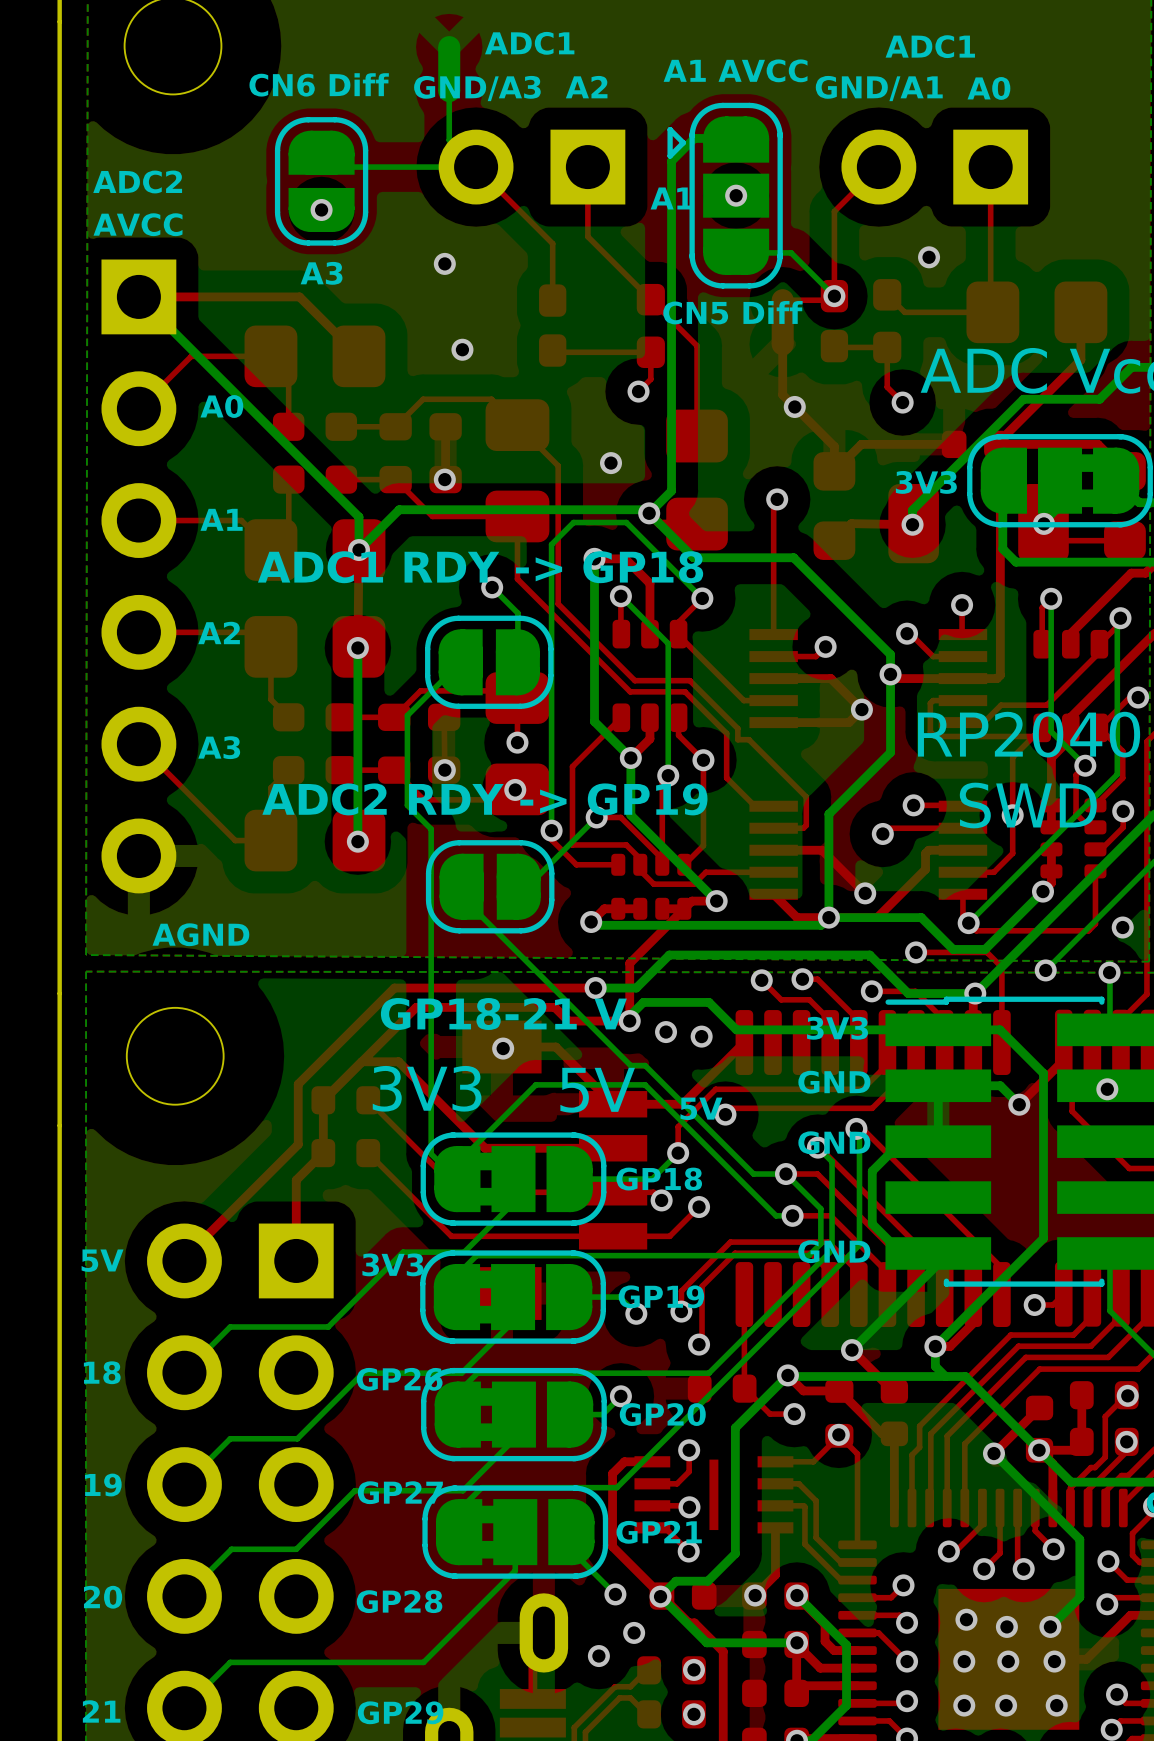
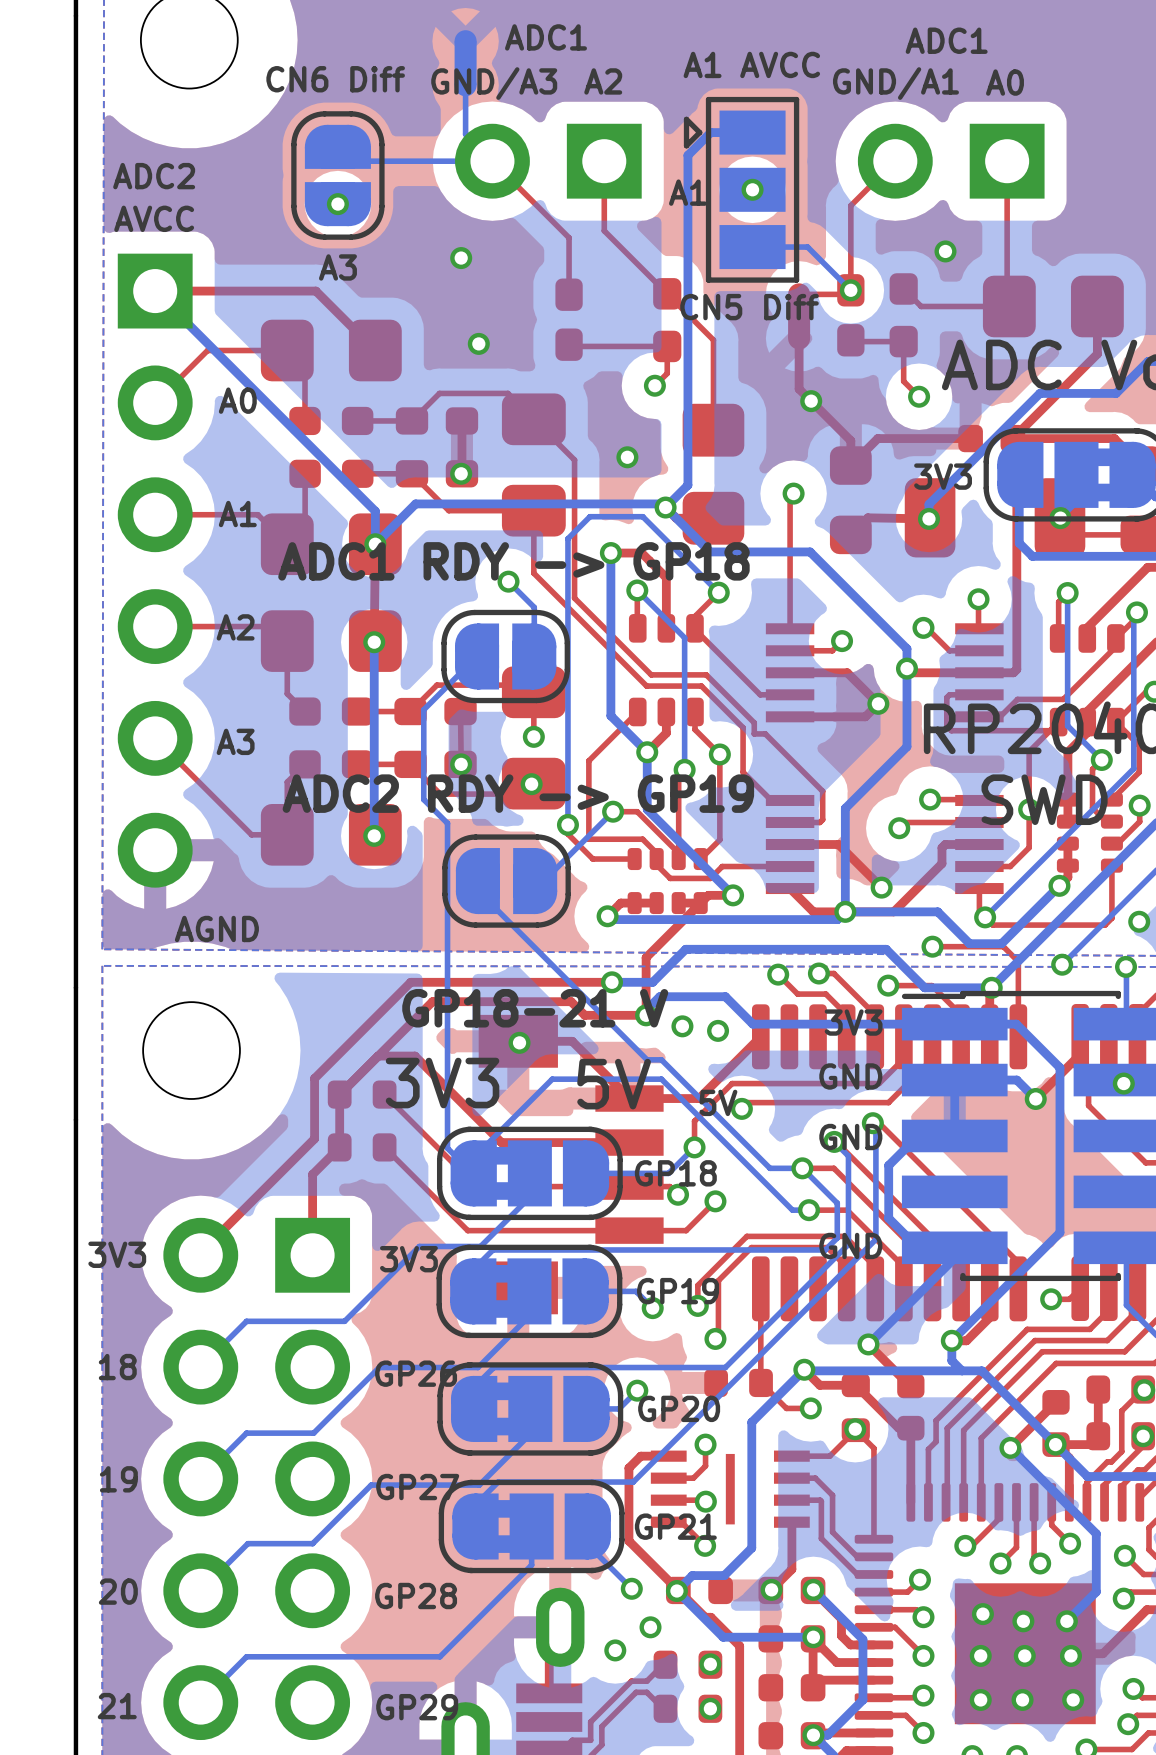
part footprint: [667, 102, 783, 289] -> [683, 96, 800, 283]
text: 5V (102, 1260) -> 3V3 (117, 1254)

